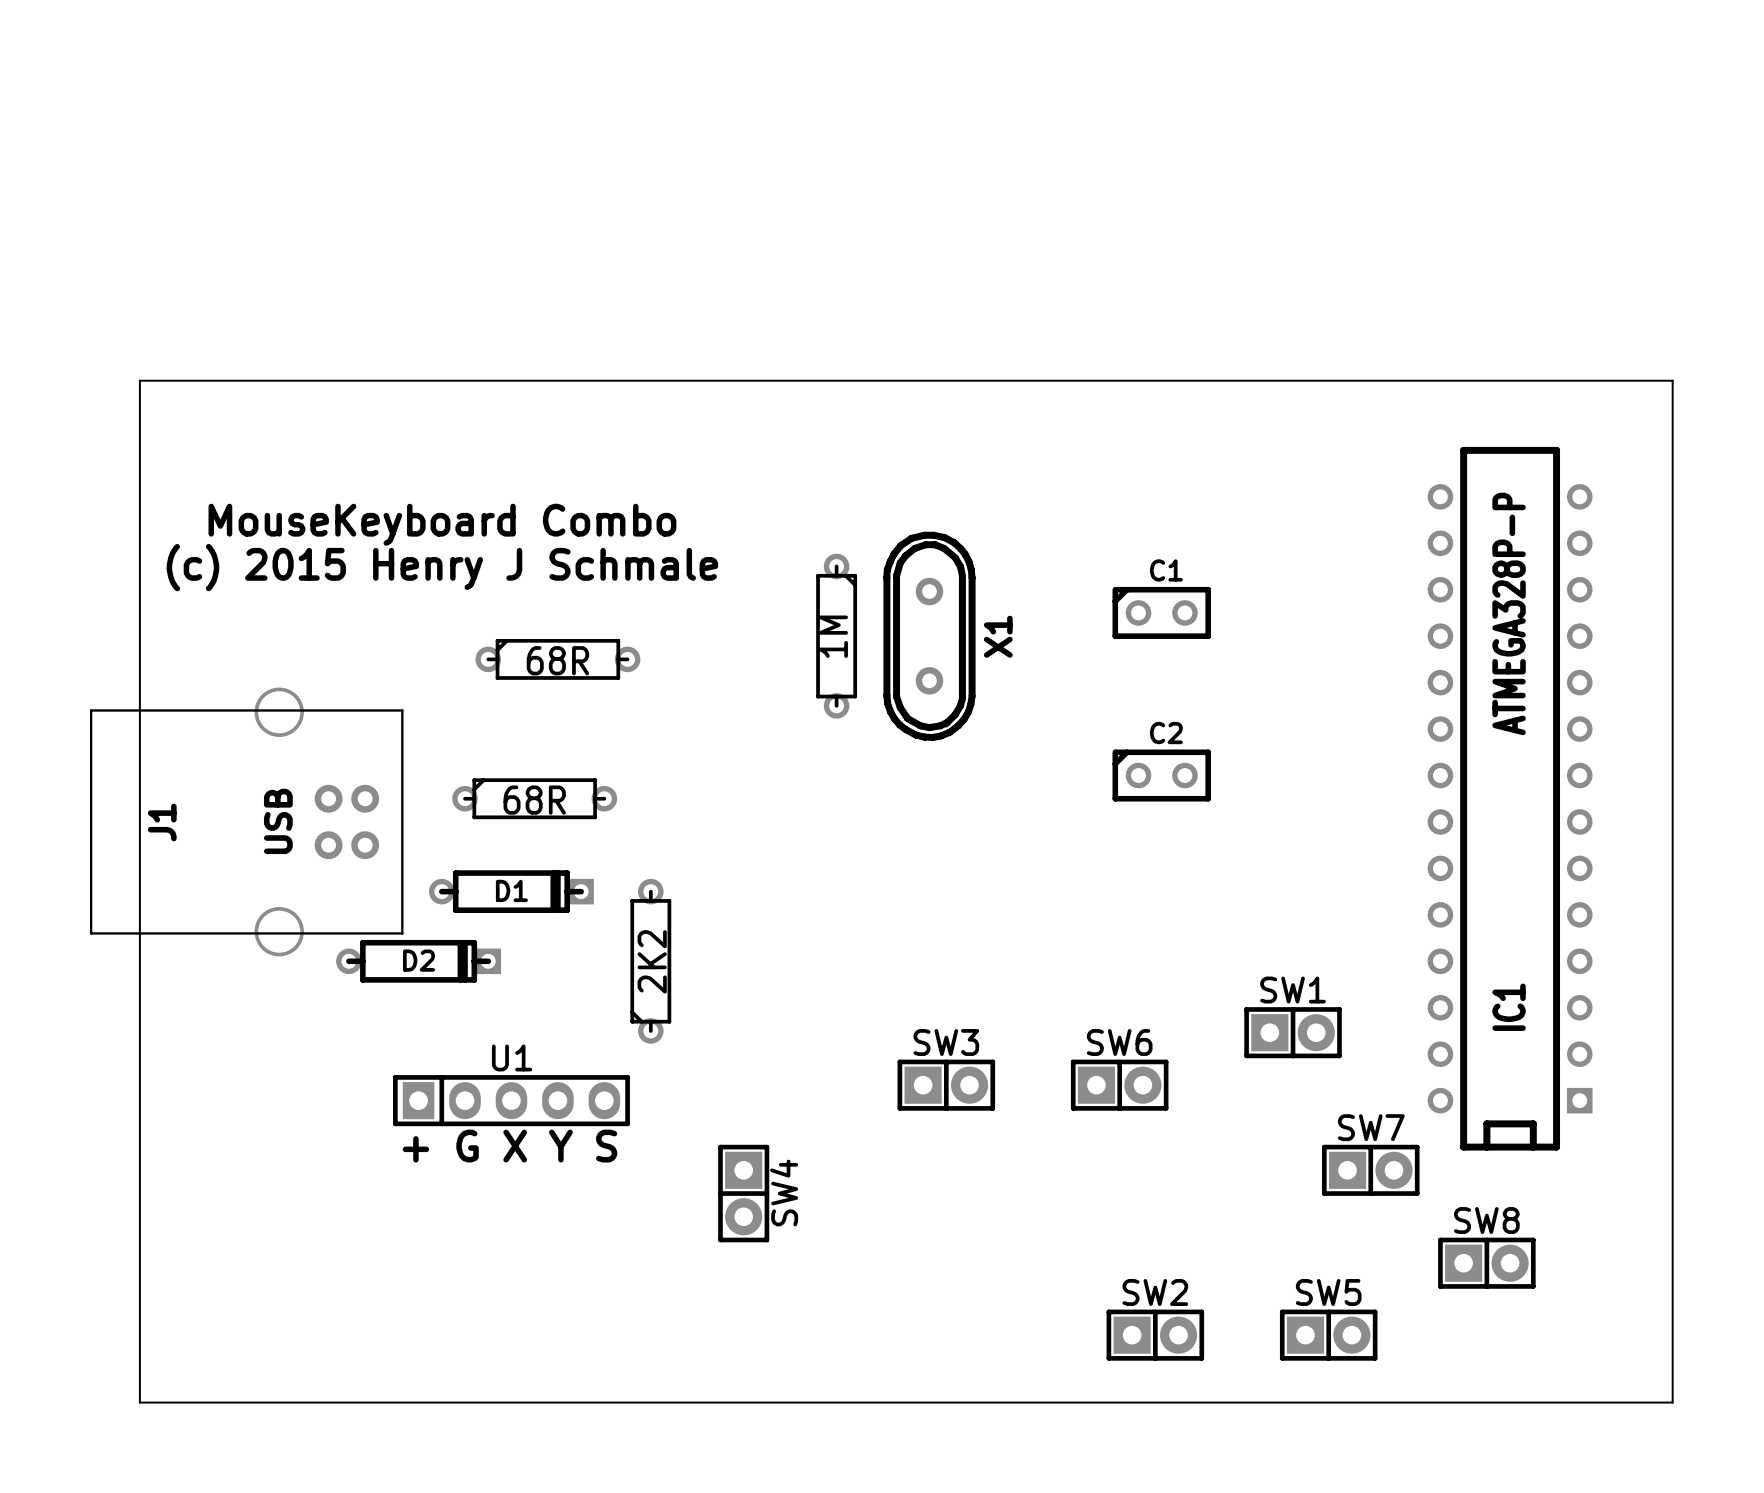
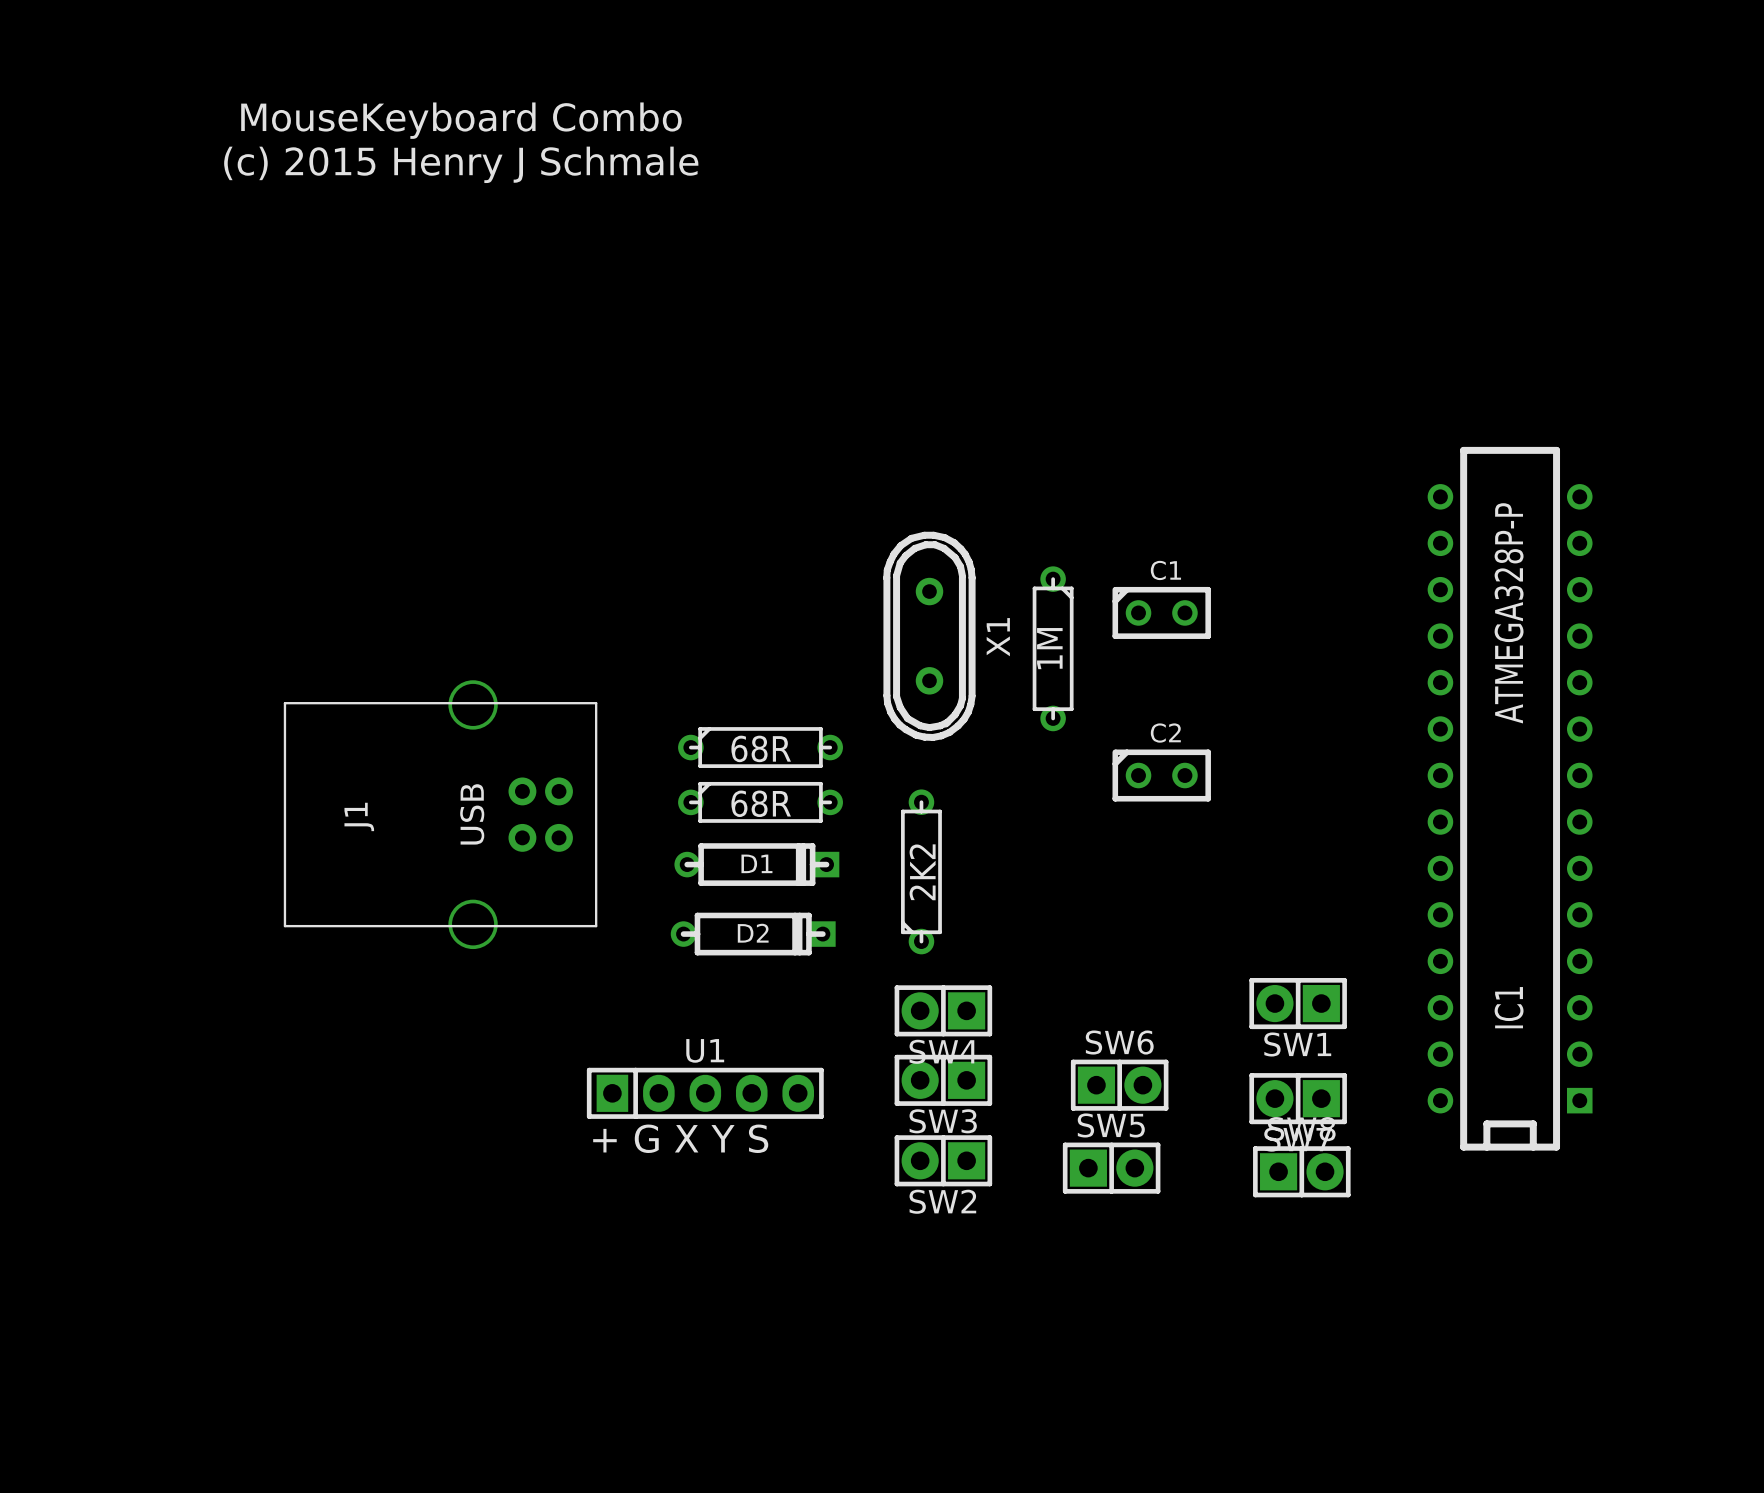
board edge: (139, 380) (139, 1402) (1672, 1402) (1672, 380) (139, 380) -> none
text position: MouseKeyboard Combo (442, 524) -> MouseKeyboard Combo (461, 120)
text position: (c) 2015 Henry J Schmale (442, 567) -> (c) 2015 Henry J Schmale (461, 164)
part position: (836, 636) -> (1053, 648)
part: 68R (557, 659) -> none
part: none -> 68R (760, 747)
part: 68R (534, 798) -> none
part: none -> 68R (760, 802)
J1 position: (246, 821) -> (440, 814)
D1 position: (511, 891) -> (756, 864)
D2 position: (418, 961) -> (753, 934)
part position: (650, 961) -> (921, 871)
SW1 rotation: 0° (1293, 1032) -> 180° (1298, 1003)
SW3 rotation: 0° (946, 1085) -> 180° (943, 1080)
U1 position: (511, 1100) -> (705, 1093)
text position: + G X Y S (509, 1146) -> + G X Y S (680, 1138)
SW7 rotation: 0° (1370, 1170) -> 180° (1298, 1098)
SW7 position: (1370, 1170) -> (1298, 1098)
SW4 rotation: 0° (743, 1193) -> 90° clockwise (943, 1010)
SW4 position: (743, 1193) -> (943, 1010)
SW8 position: (1486, 1263) -> (1301, 1171)
SW2 rotation: 0° (1155, 1335) -> 180° (943, 1160)
SW2 position: (1155, 1335) -> (943, 1160)
SW5 position: (1328, 1335) -> (1111, 1168)

